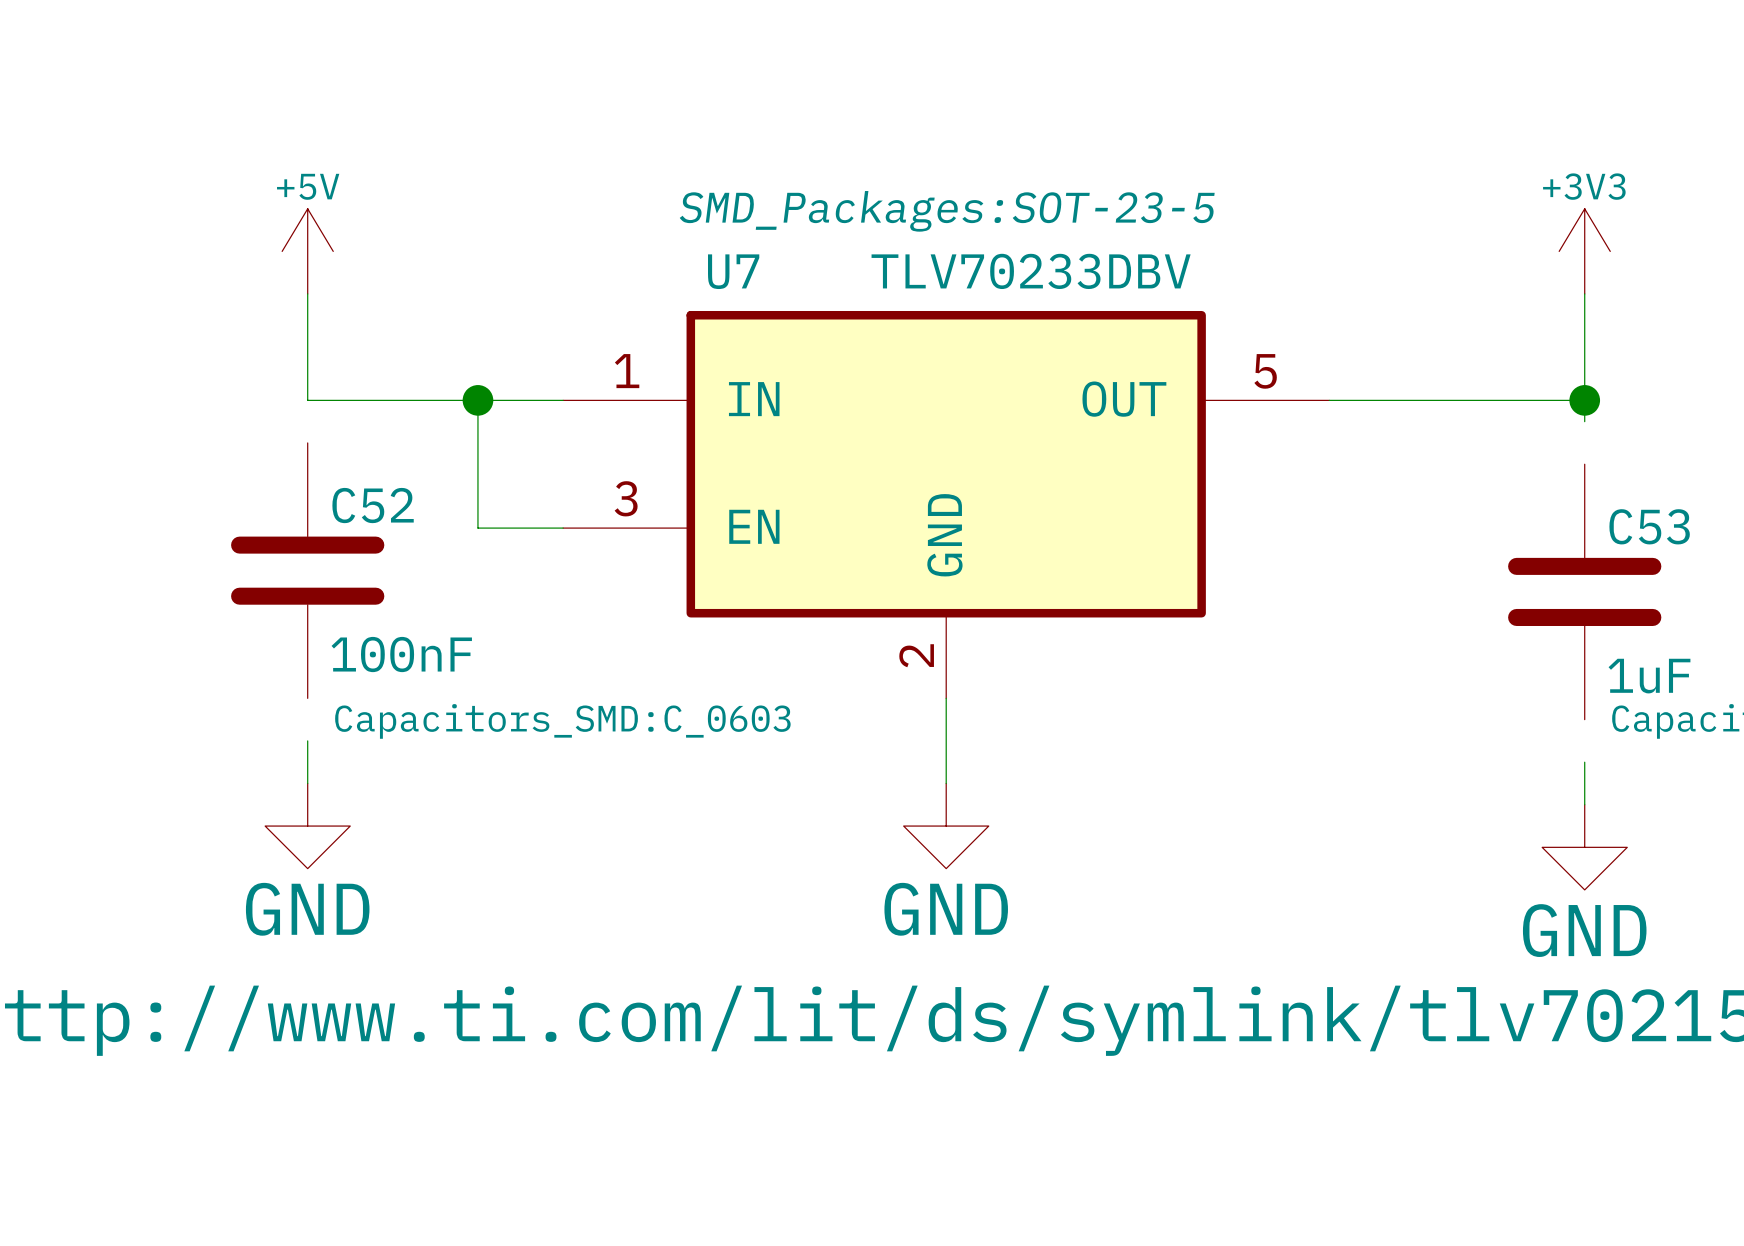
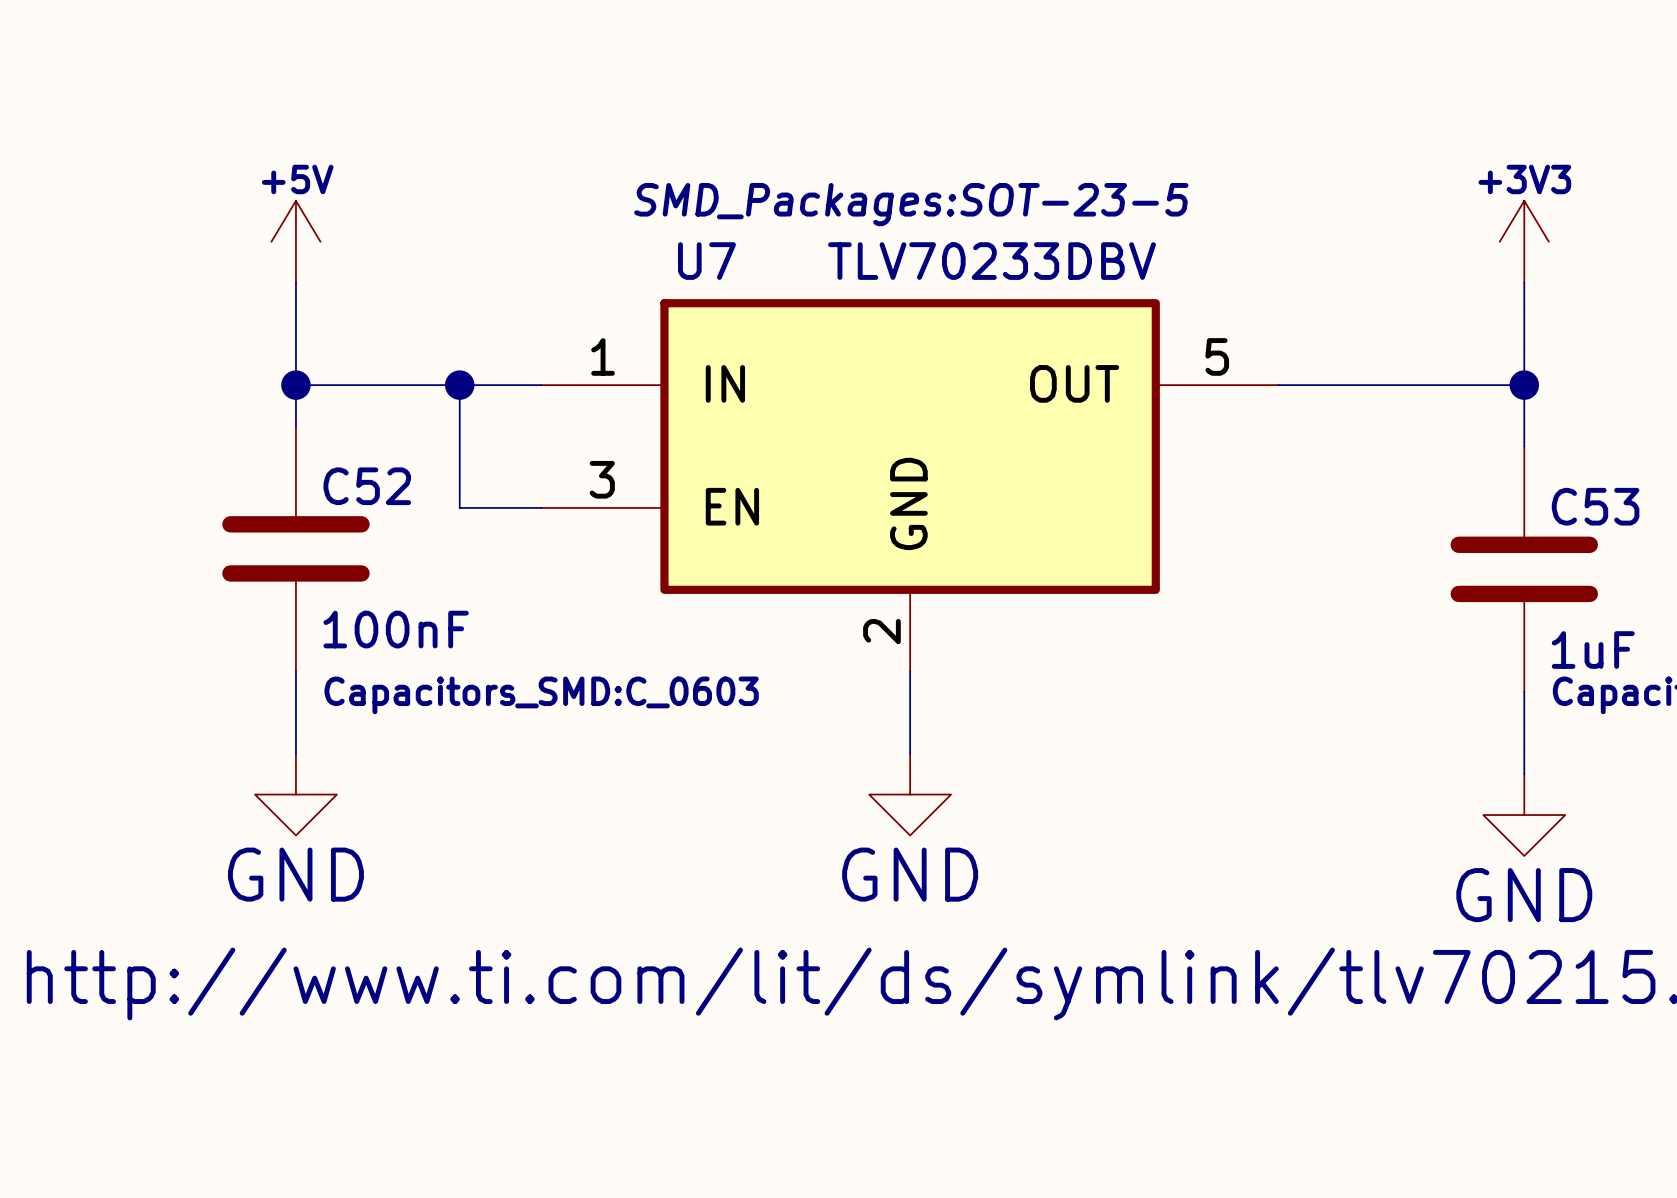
wire: none -> (295, 385) (295, 426)
junction: none -> (295, 385)
wire: none -> (1524, 405) (1524, 446)
wire: none -> (295, 671) (295, 712)
wire: none -> (1524, 692) (1524, 733)

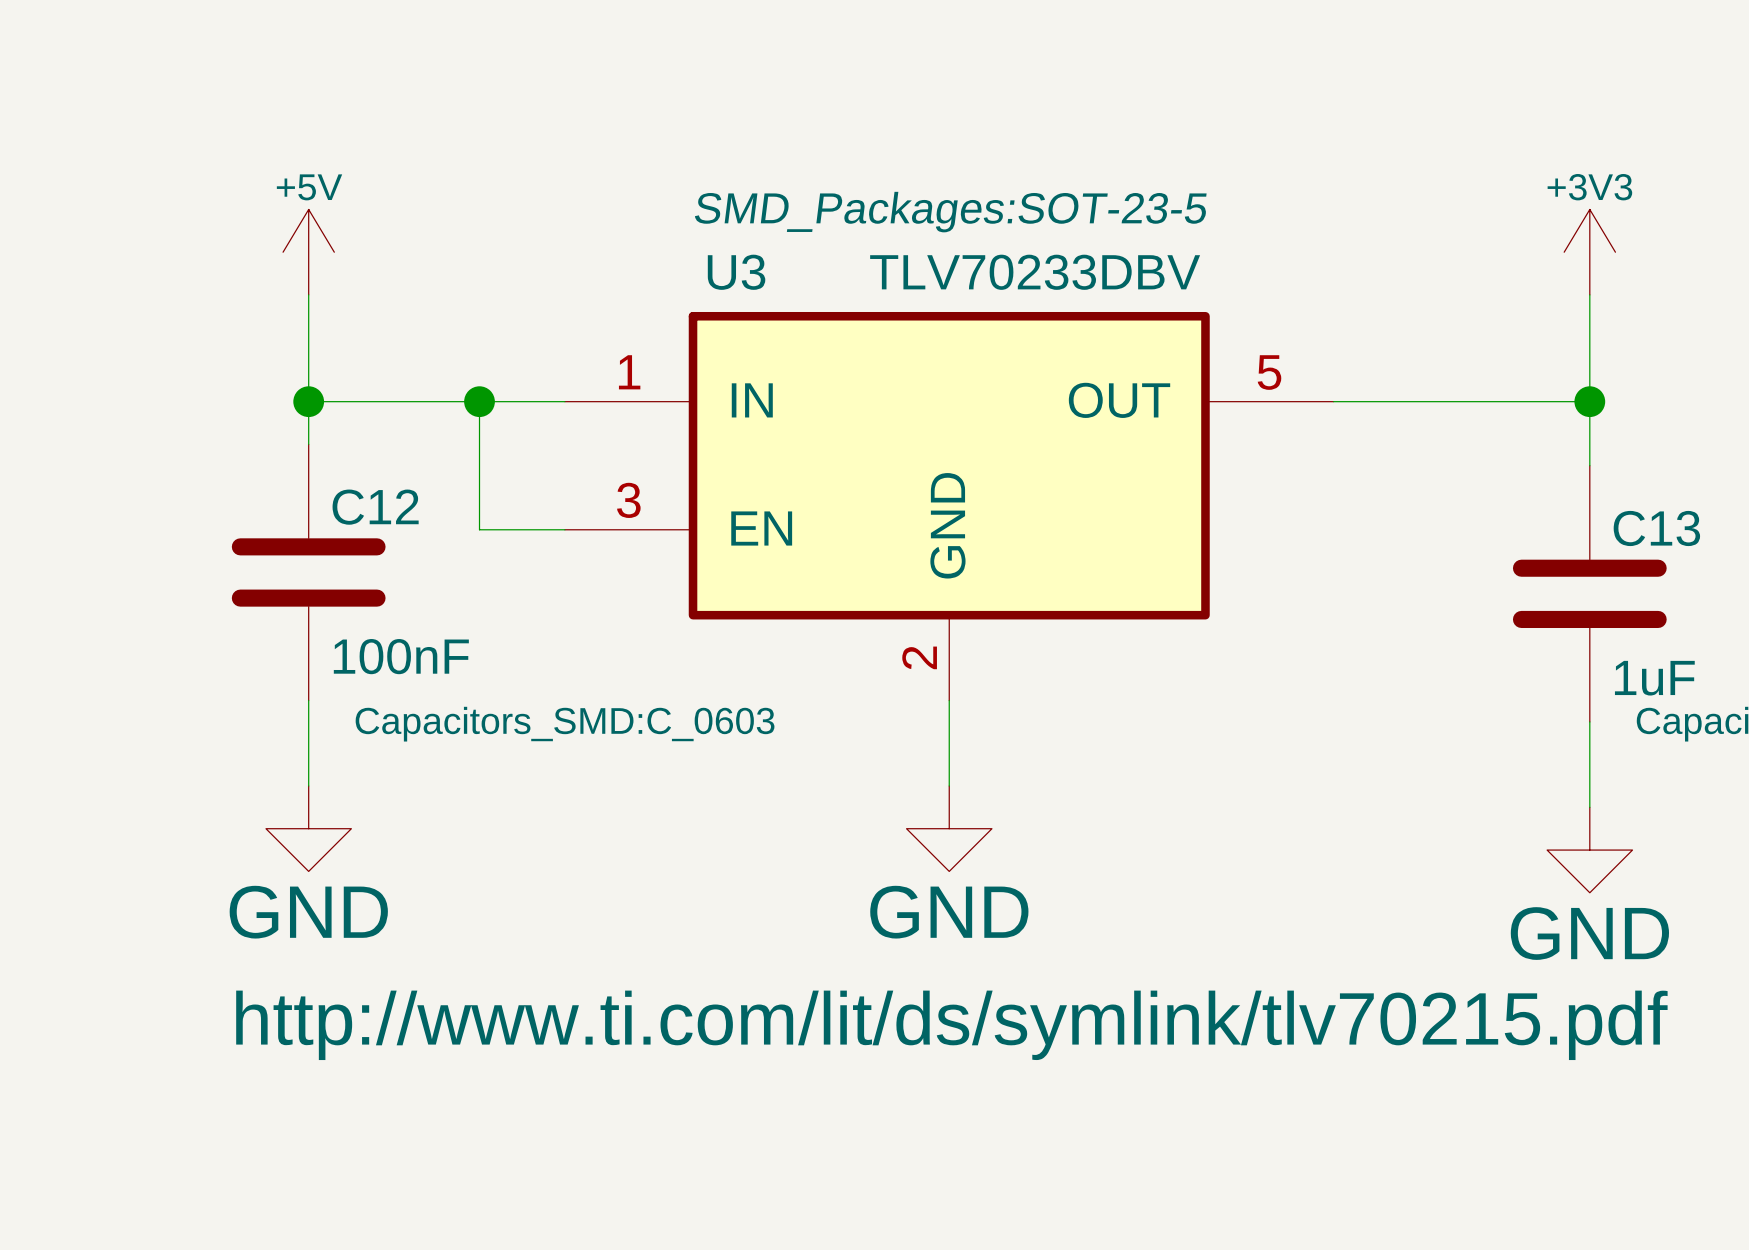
U7 name: U7 (706, 261) -> U3 (736, 272)
C52 name: C52 (367, 486) -> C12 (375, 507)
C53 name: C53 (1595, 506) -> C13 (1656, 528)

